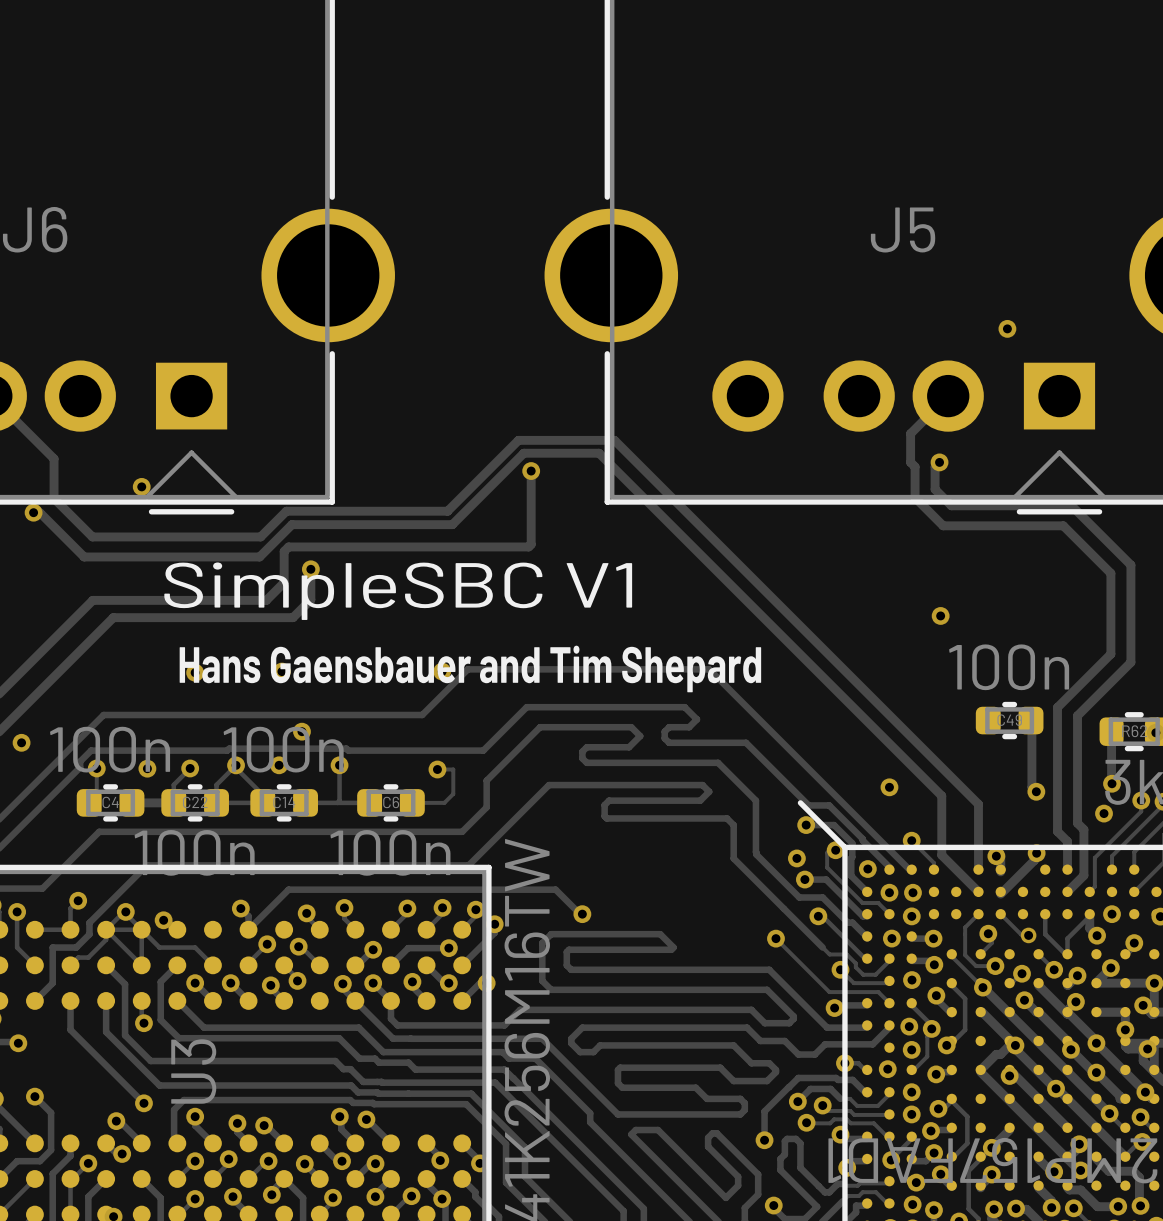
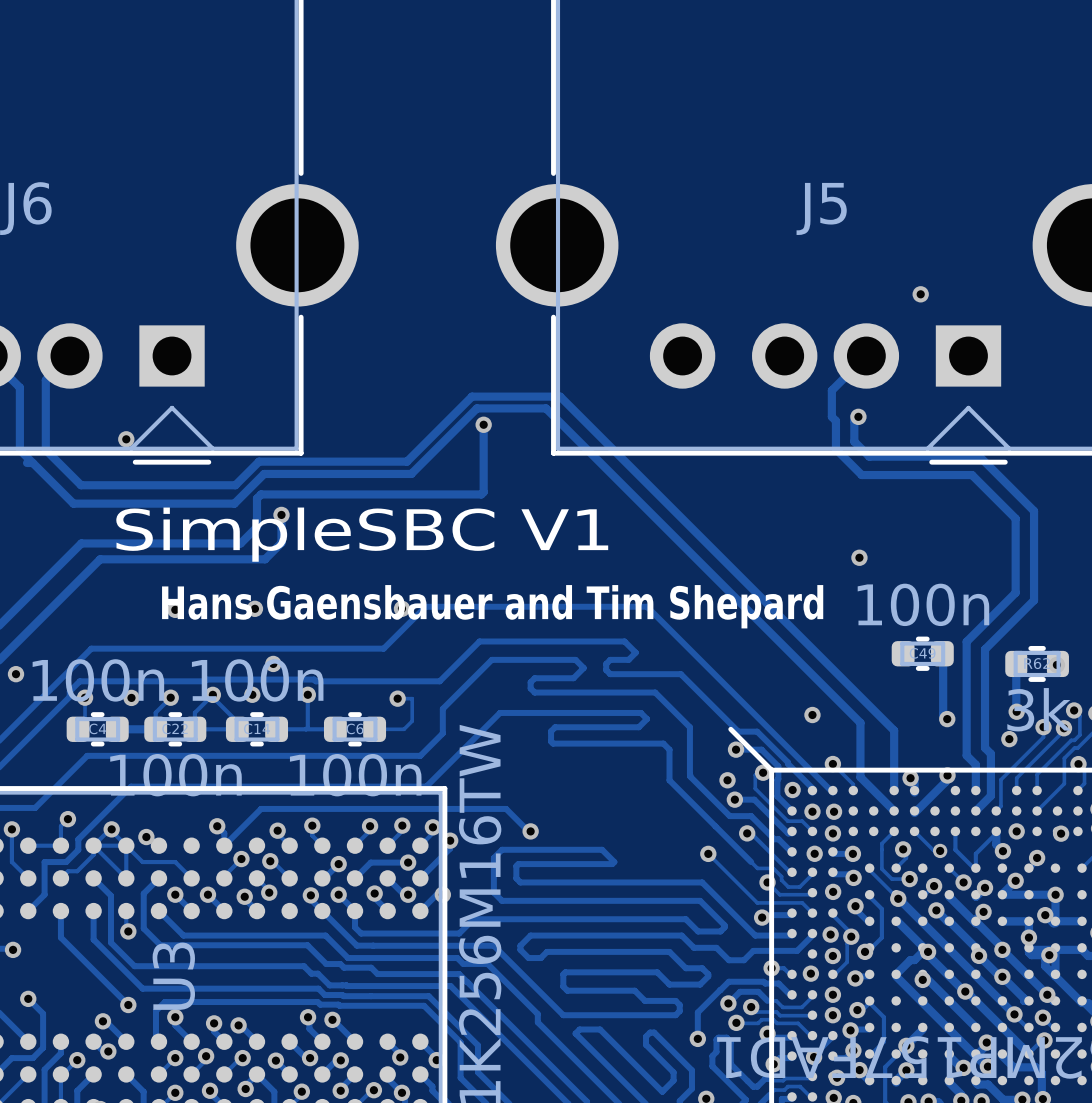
track: none -> (69, 355) (45, 380) (45, 413)
track: (25, 430) (54, 458) -> (19, 387) (19, 450) (32, 462)
via: (33, 512) -> none

